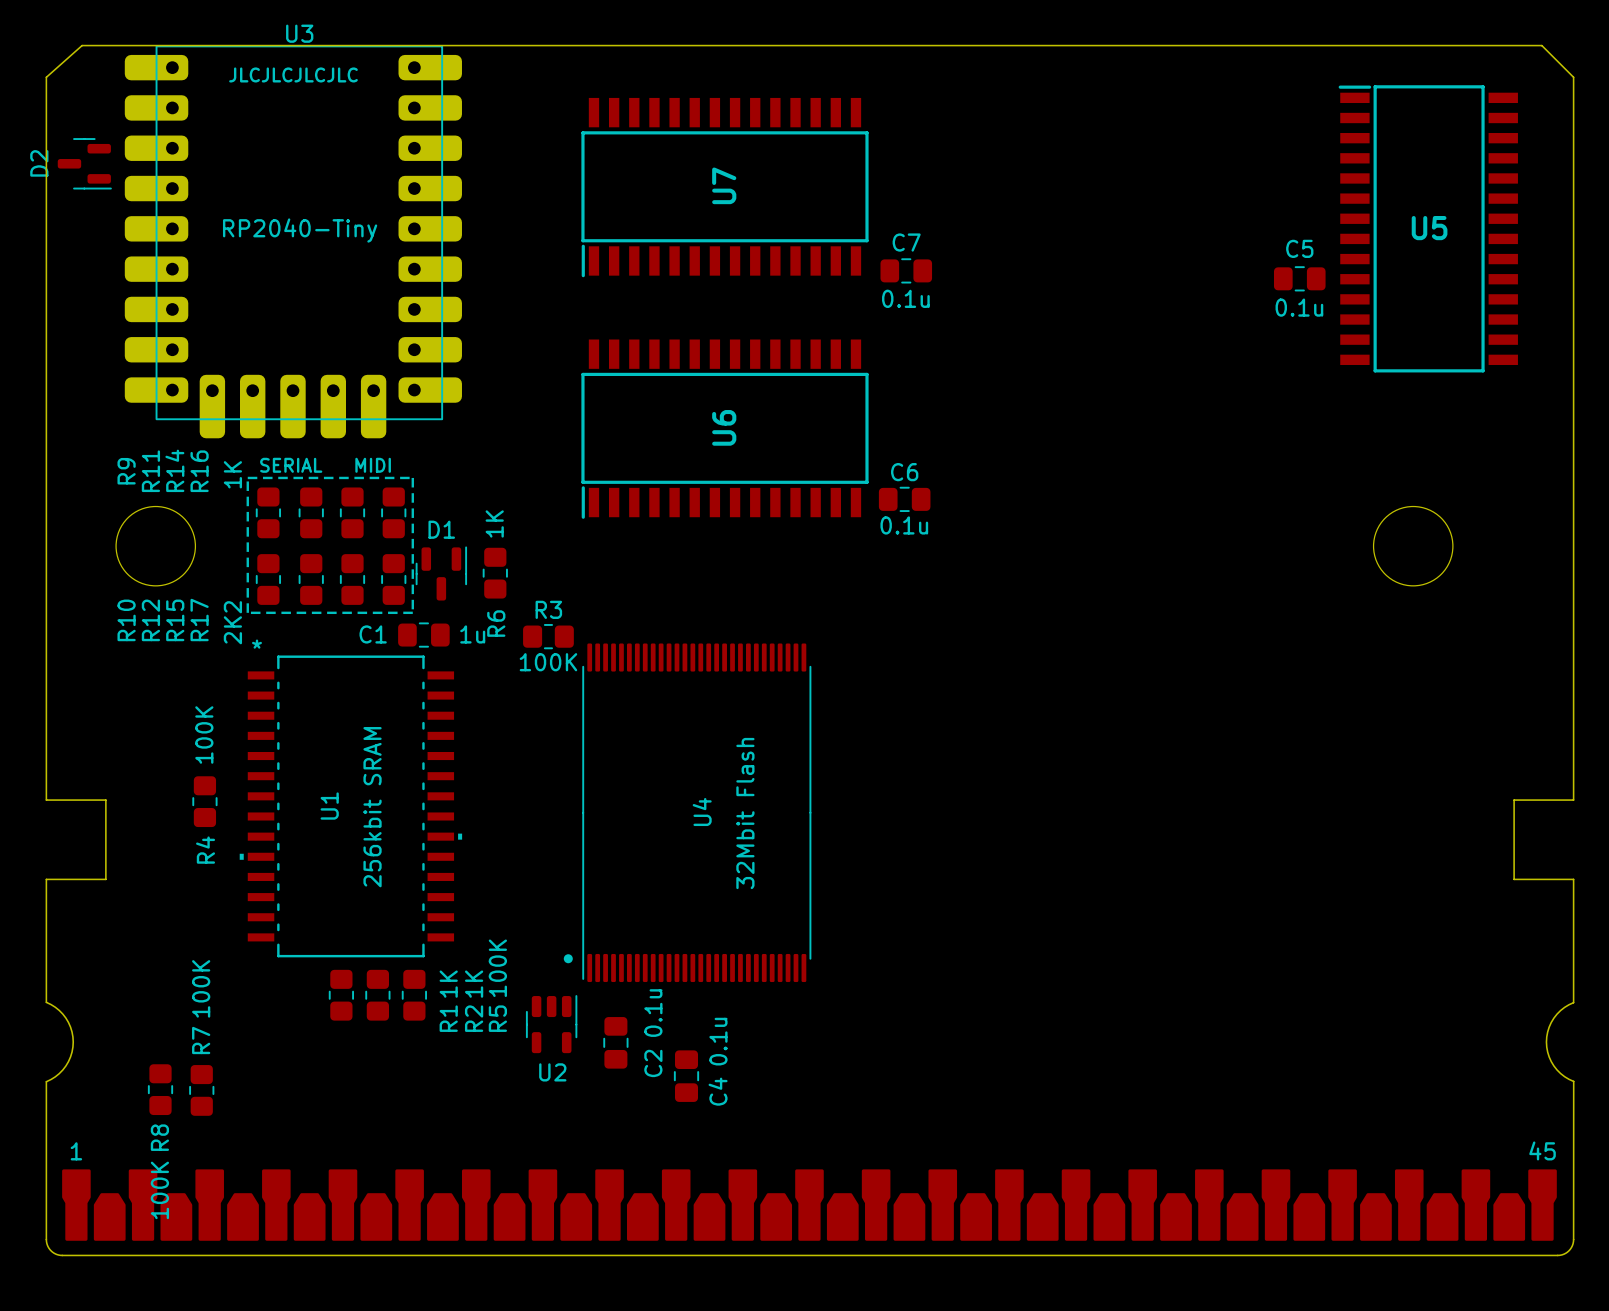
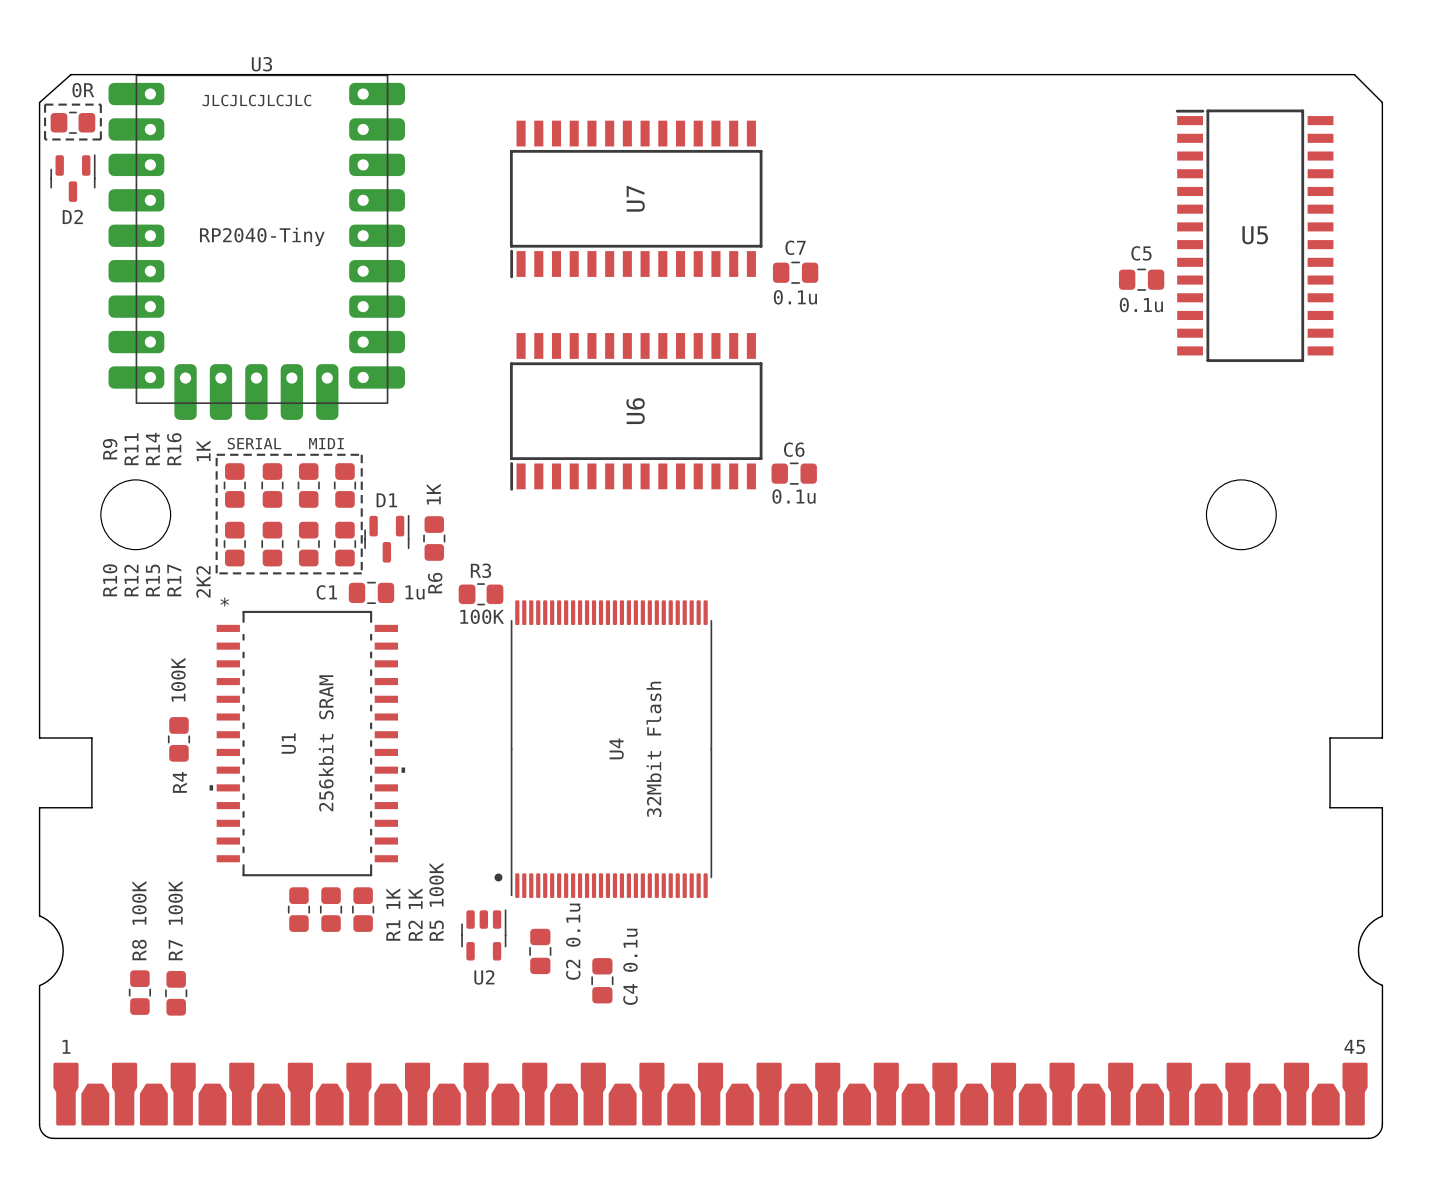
line: none -> (45, 104) (100, 104) (100, 139) (45, 139) (45, 104)
part: none -> 0R (72, 122)
D2 rotation: 0° (84, 163) -> 90° counterclockwise (72, 178)
R8 name position: R8 (159, 1137) -> R8 (139, 949)
R8 value position: 100K (159, 1190) -> 100K (139, 902)

